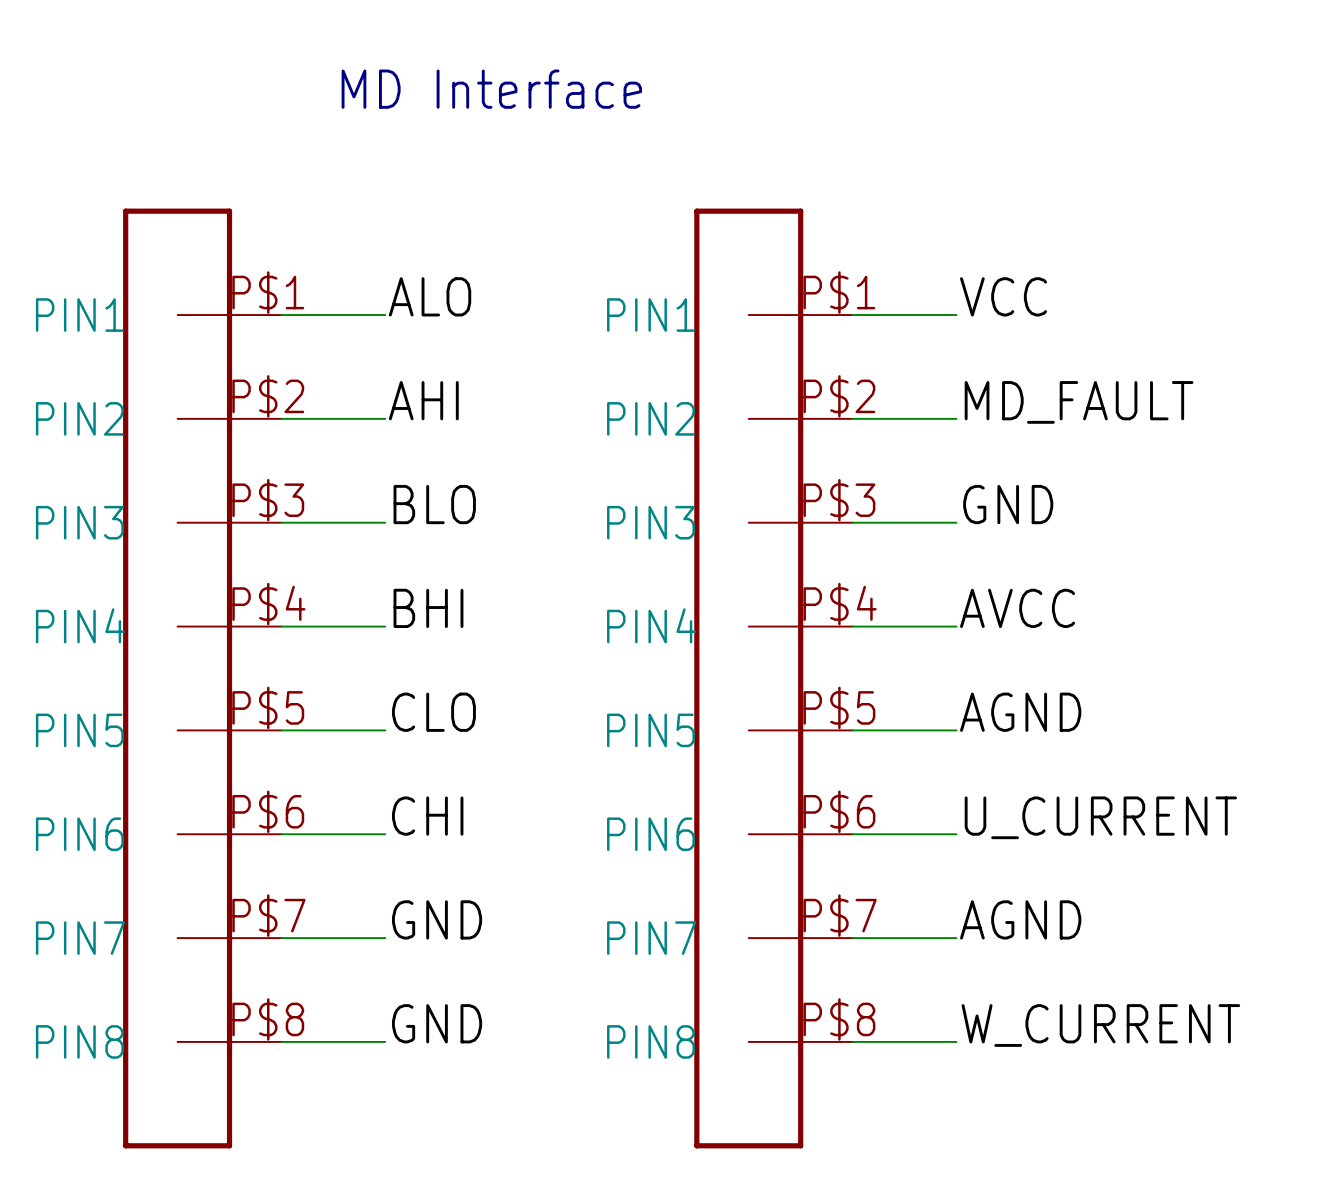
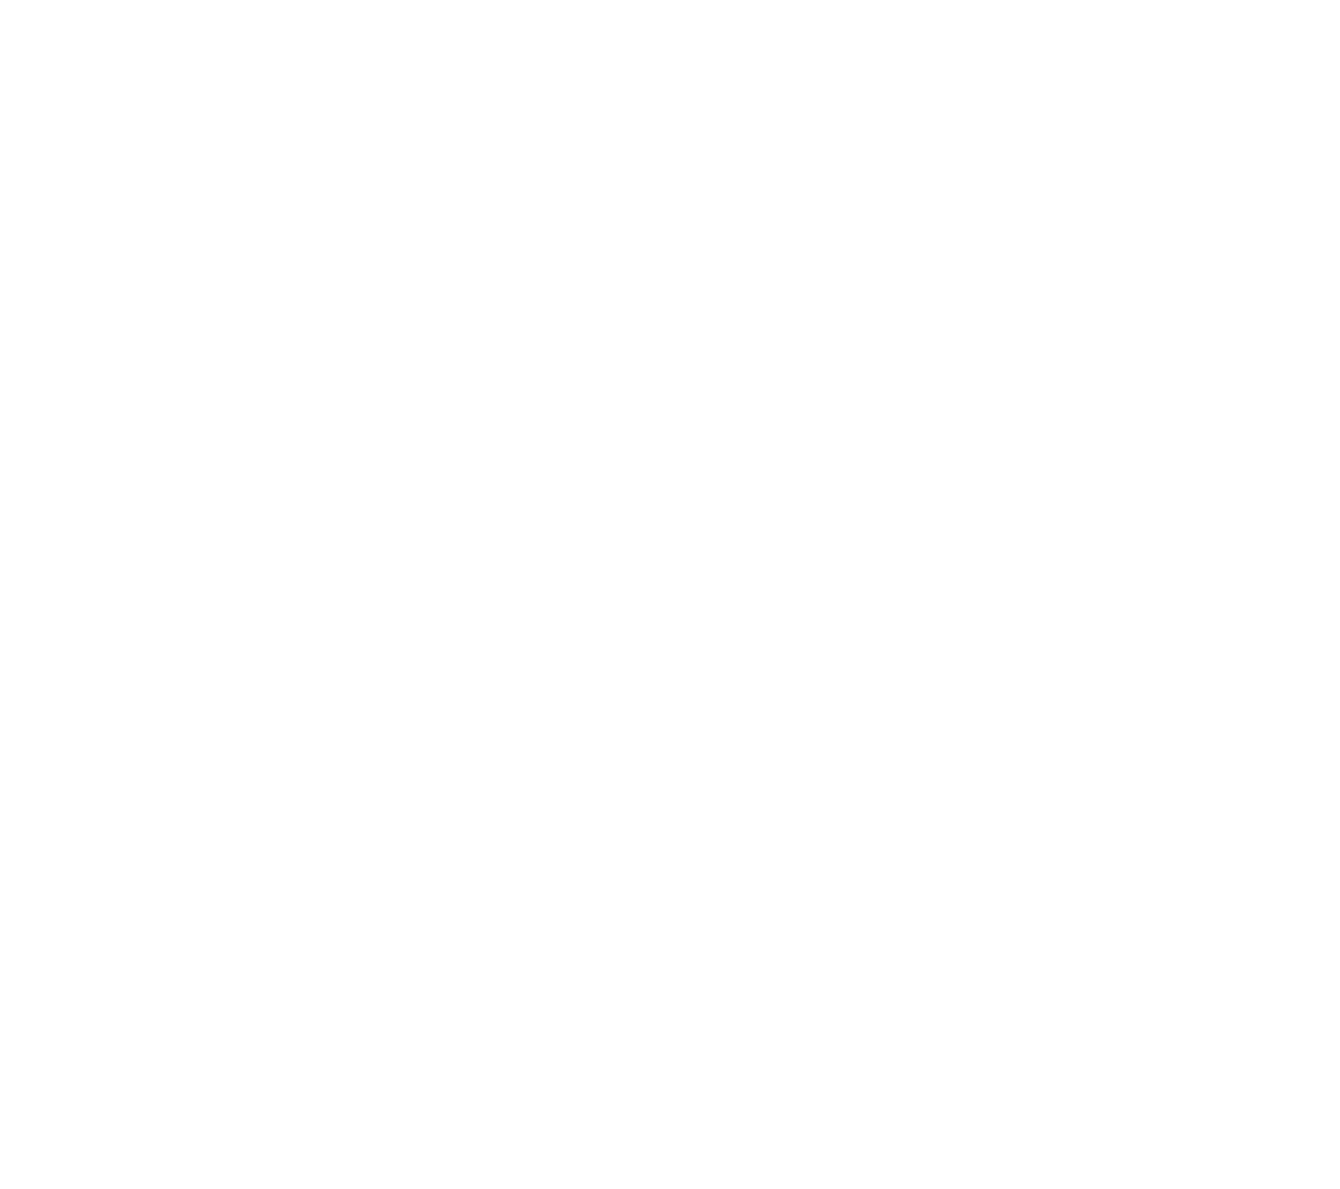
text: MD Interface (491, 89) -> none
label: ALO (430, 296) -> none
label: VCC (1003, 296) -> none
wire: (281, 315) (385, 315) -> none
wire: (852, 315) (956, 315) -> none
label: AHI (423, 400) -> none
label: MD_FAULT (1079, 402) -> none
wire: (281, 418) (385, 418) -> none
wire: (852, 418) (956, 418) -> none
label: BLO (434, 504) -> none
label: GND (1008, 504) -> none
wire: (281, 522) (385, 522) -> none
wire: (852, 522) (956, 522) -> none
label: BHI (428, 608) -> none
label: AVCC (1017, 608) -> none
wire: (281, 626) (385, 626) -> none
wire: (852, 626) (956, 626) -> none
part: (202, 678) -> none
part: (773, 678) -> none
label: CLO (433, 712) -> none
label: AGND (1020, 712) -> none
wire: (281, 730) (385, 730) -> none
wire: (852, 730) (956, 730) -> none
label: CHI (427, 816) -> none
label: U_CURRENT (1100, 817) -> none
wire: (281, 834) (385, 834) -> none
wire: (852, 834) (956, 834) -> none
label: GND (437, 919) -> none
label: AGND (1020, 919) -> none
wire: (281, 938) (385, 938) -> none
wire: (852, 938) (956, 938) -> none
label: GND (437, 1023) -> none
label: W_CURRENT (1100, 1025) -> none
wire: (281, 1041) (385, 1041) -> none
wire: (852, 1041) (956, 1041) -> none

